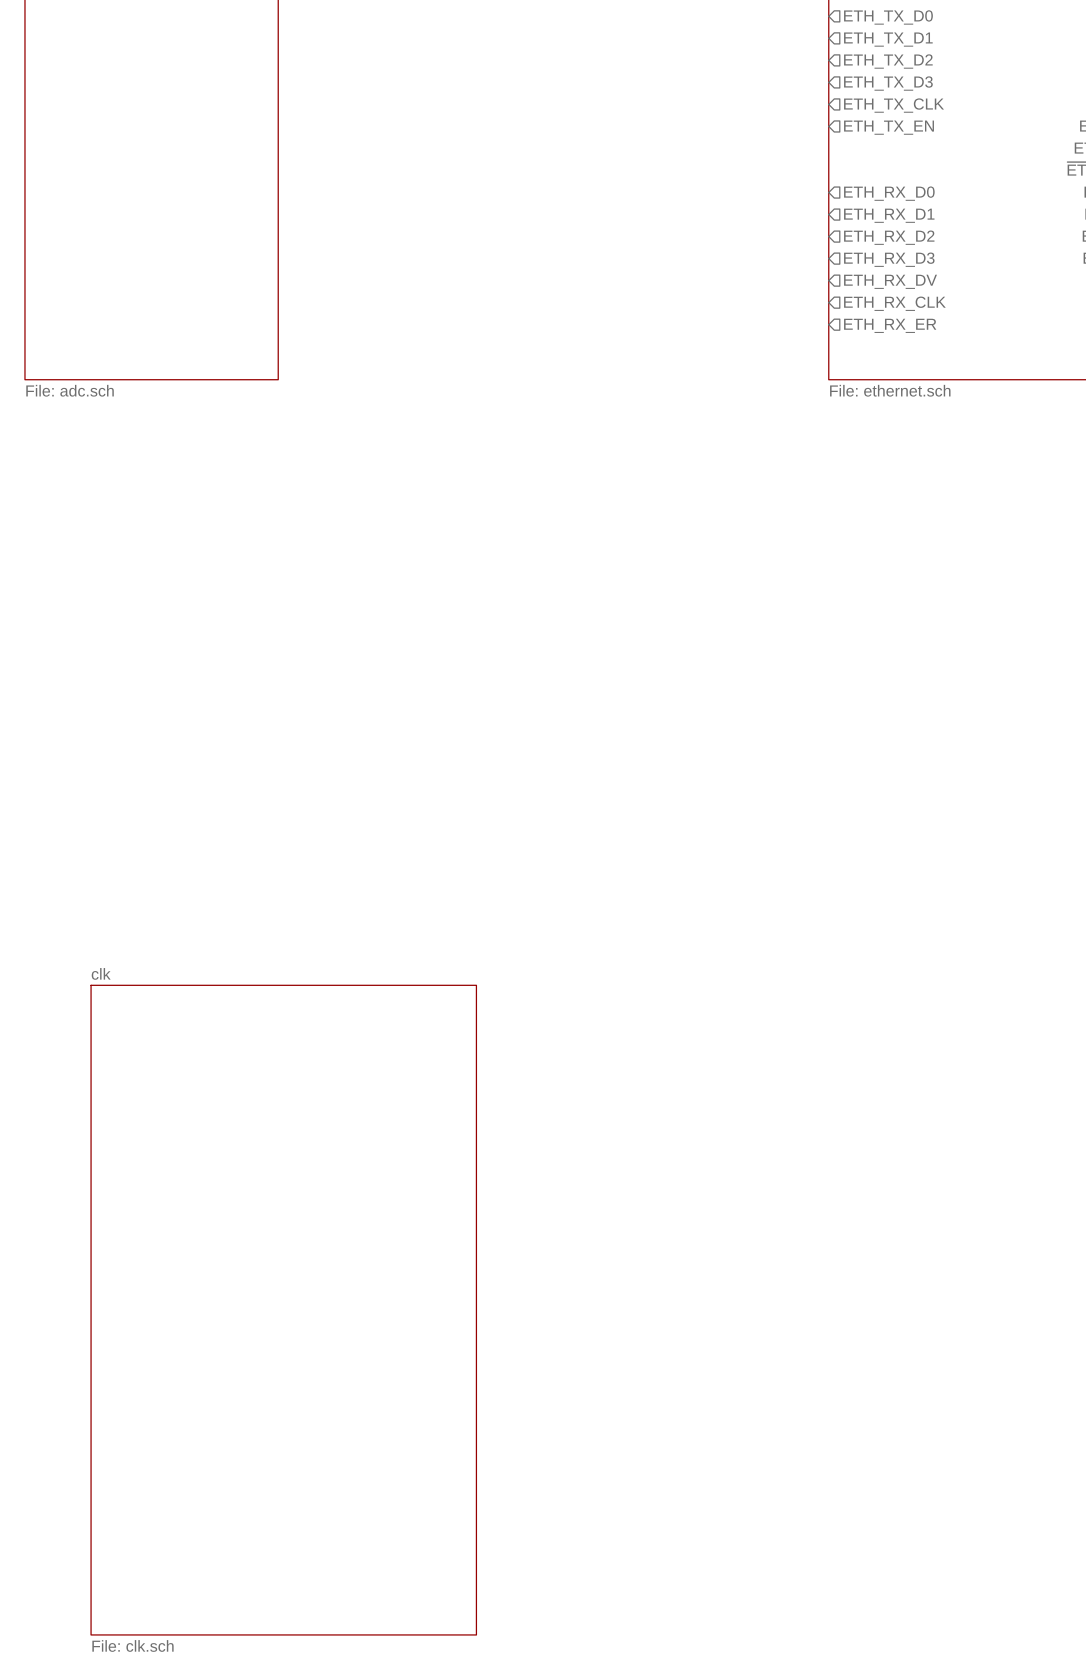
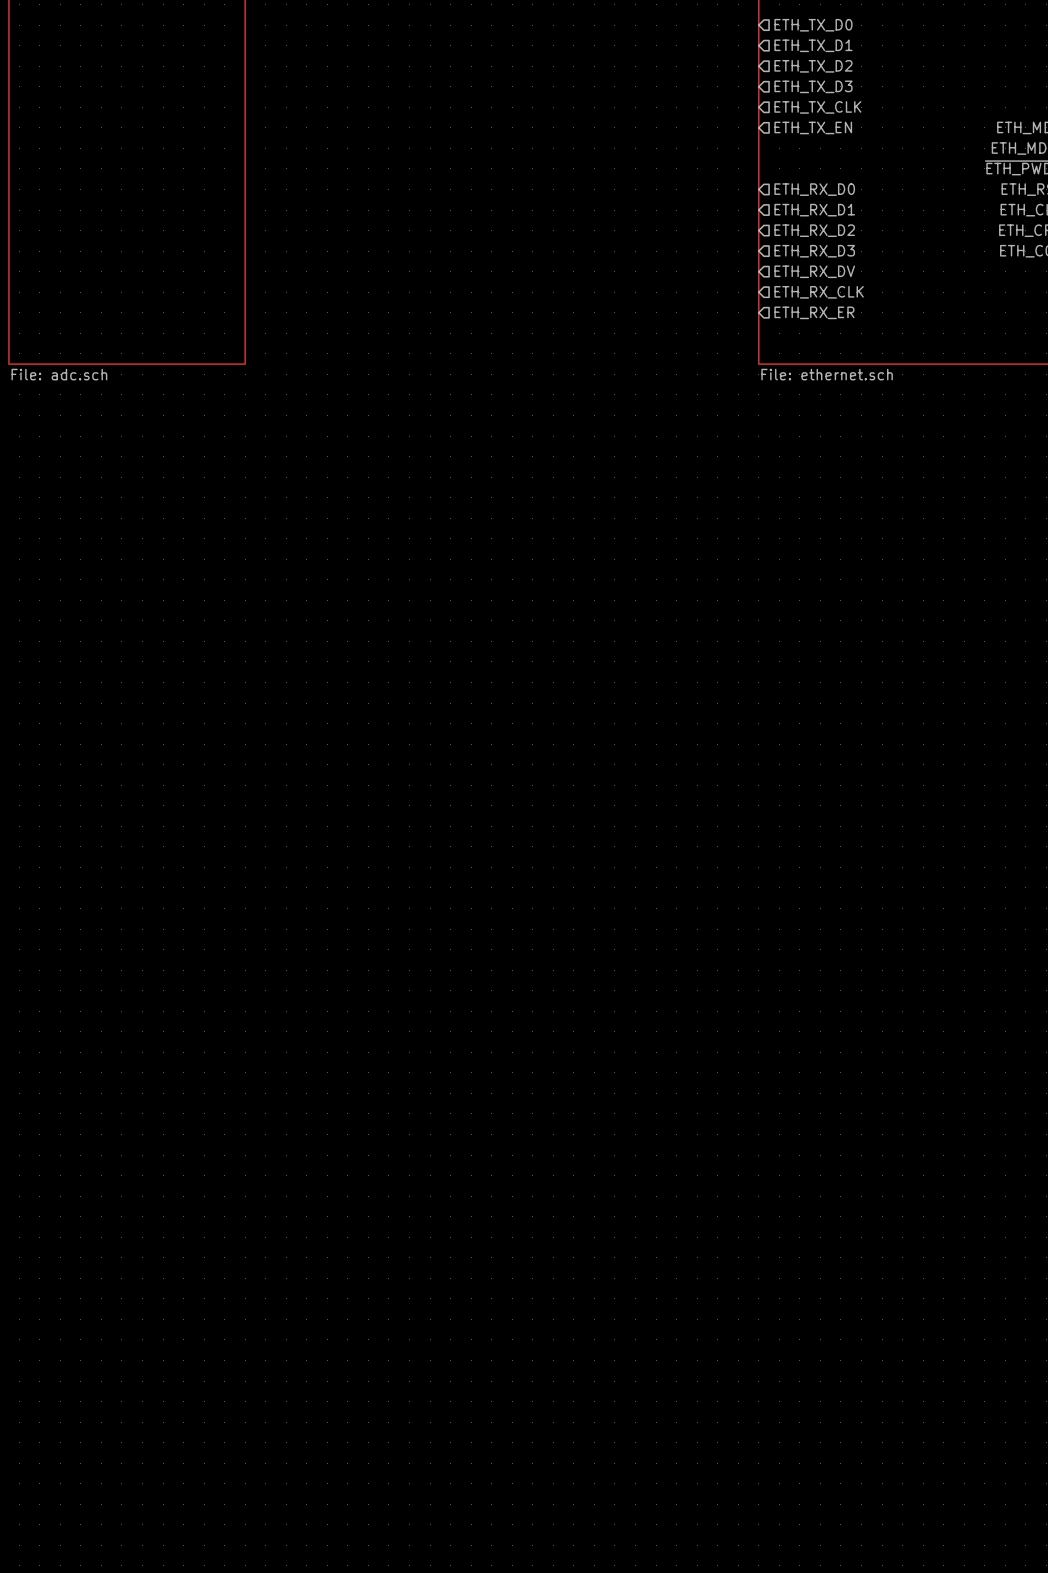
sheet clk: File: clk.sch (283, 1310) -> none

